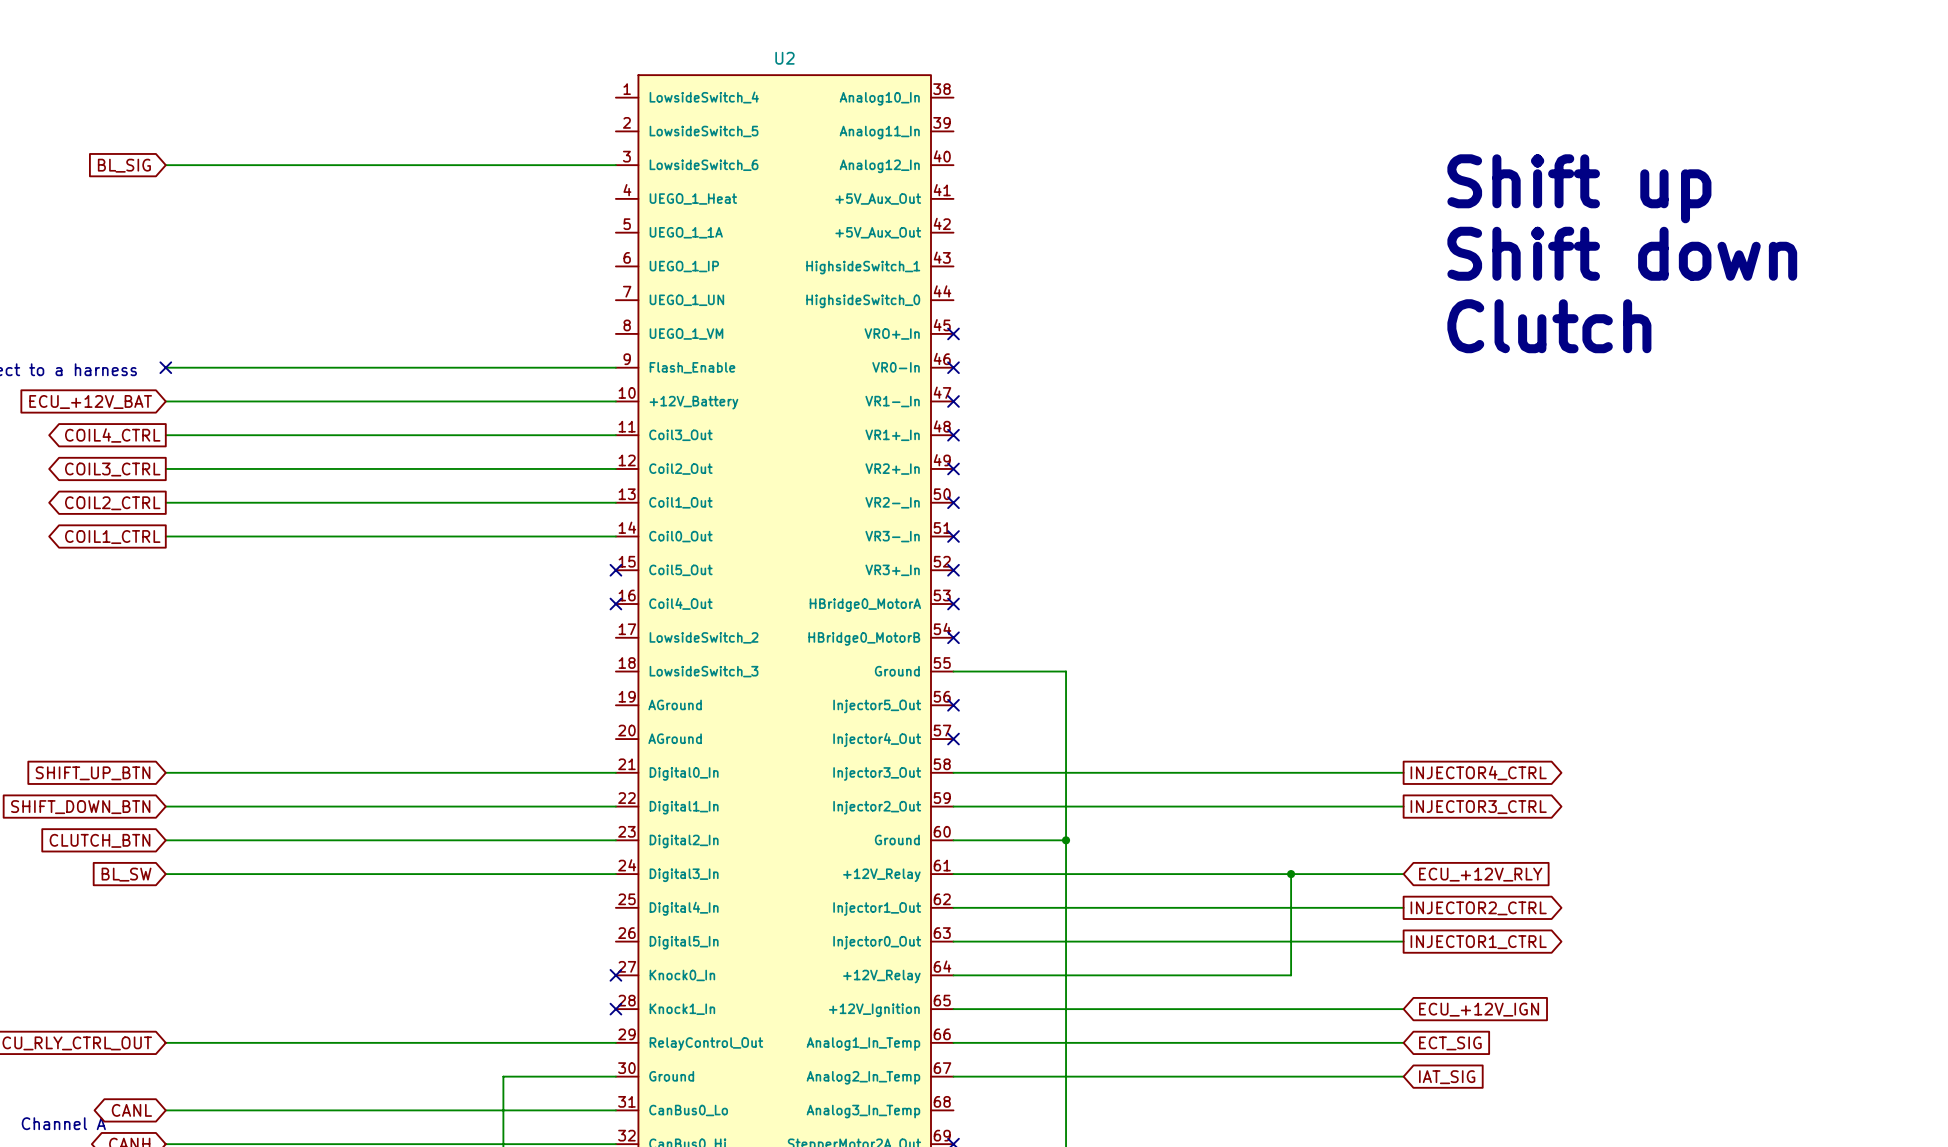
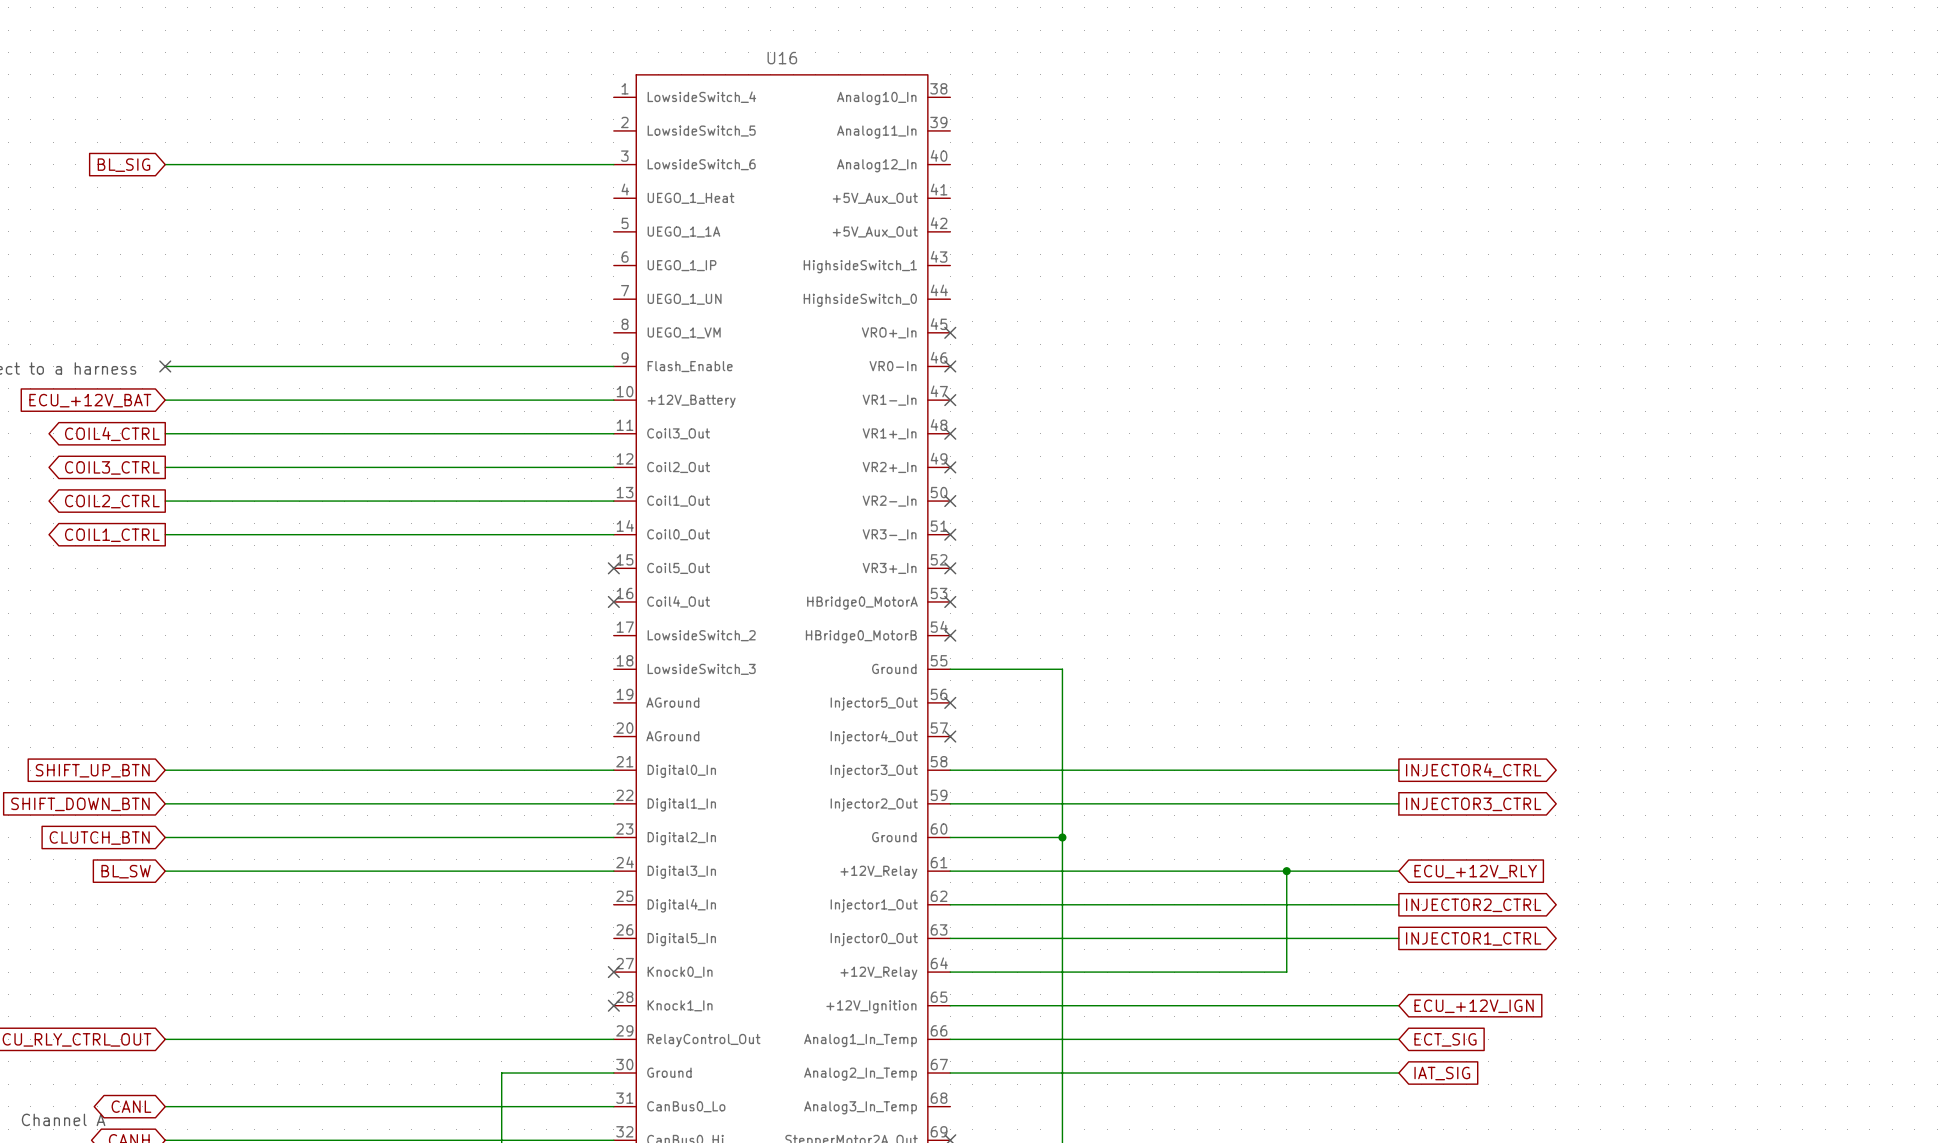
U2 name: U2 (784, 58) -> U16 (782, 58)
text: Shift up (1579, 188) -> none
text: Shift down (1622, 253) -> none
text: Clutch (1549, 326) -> none

